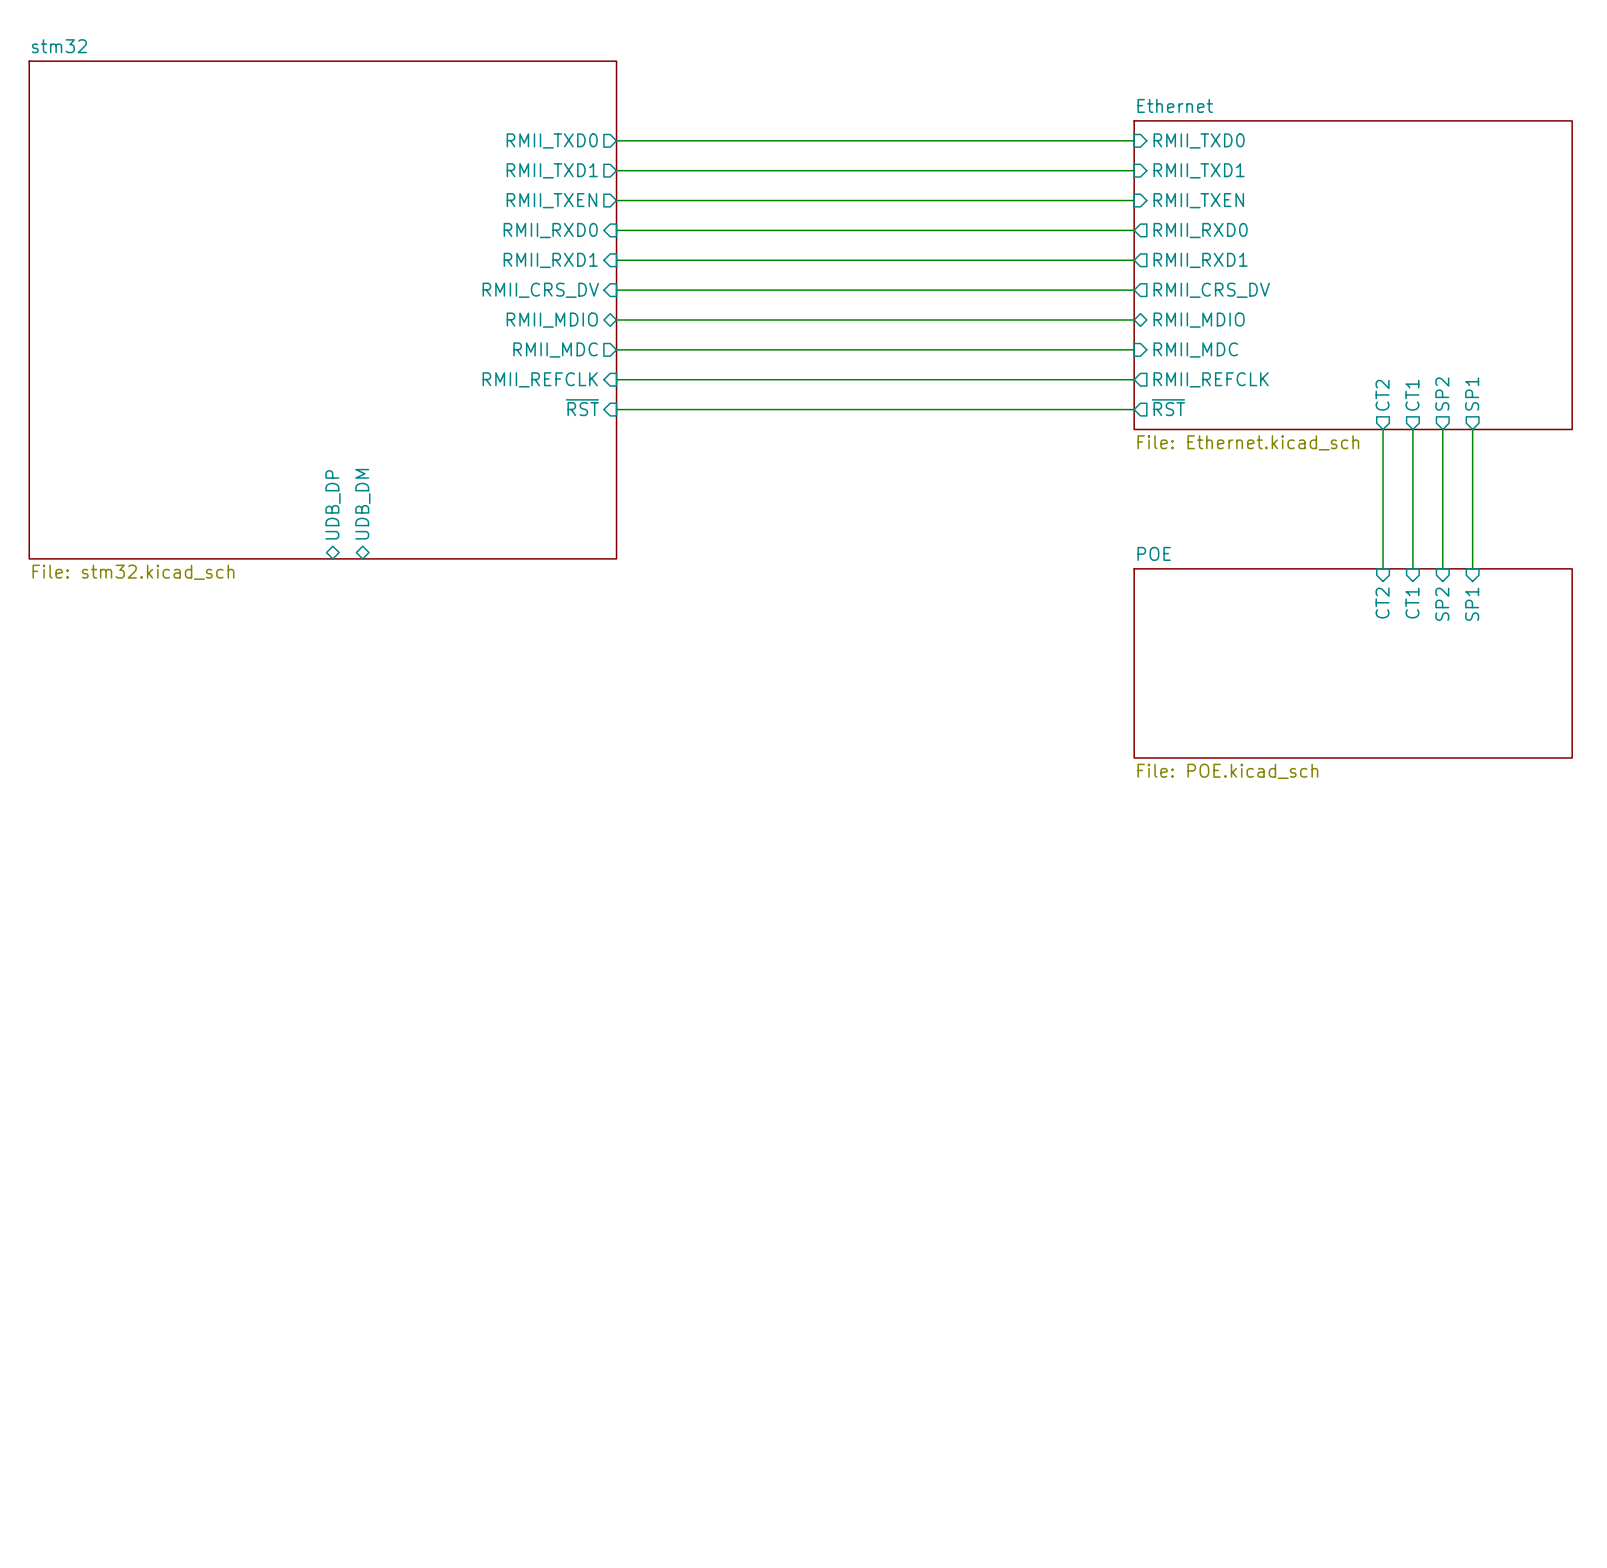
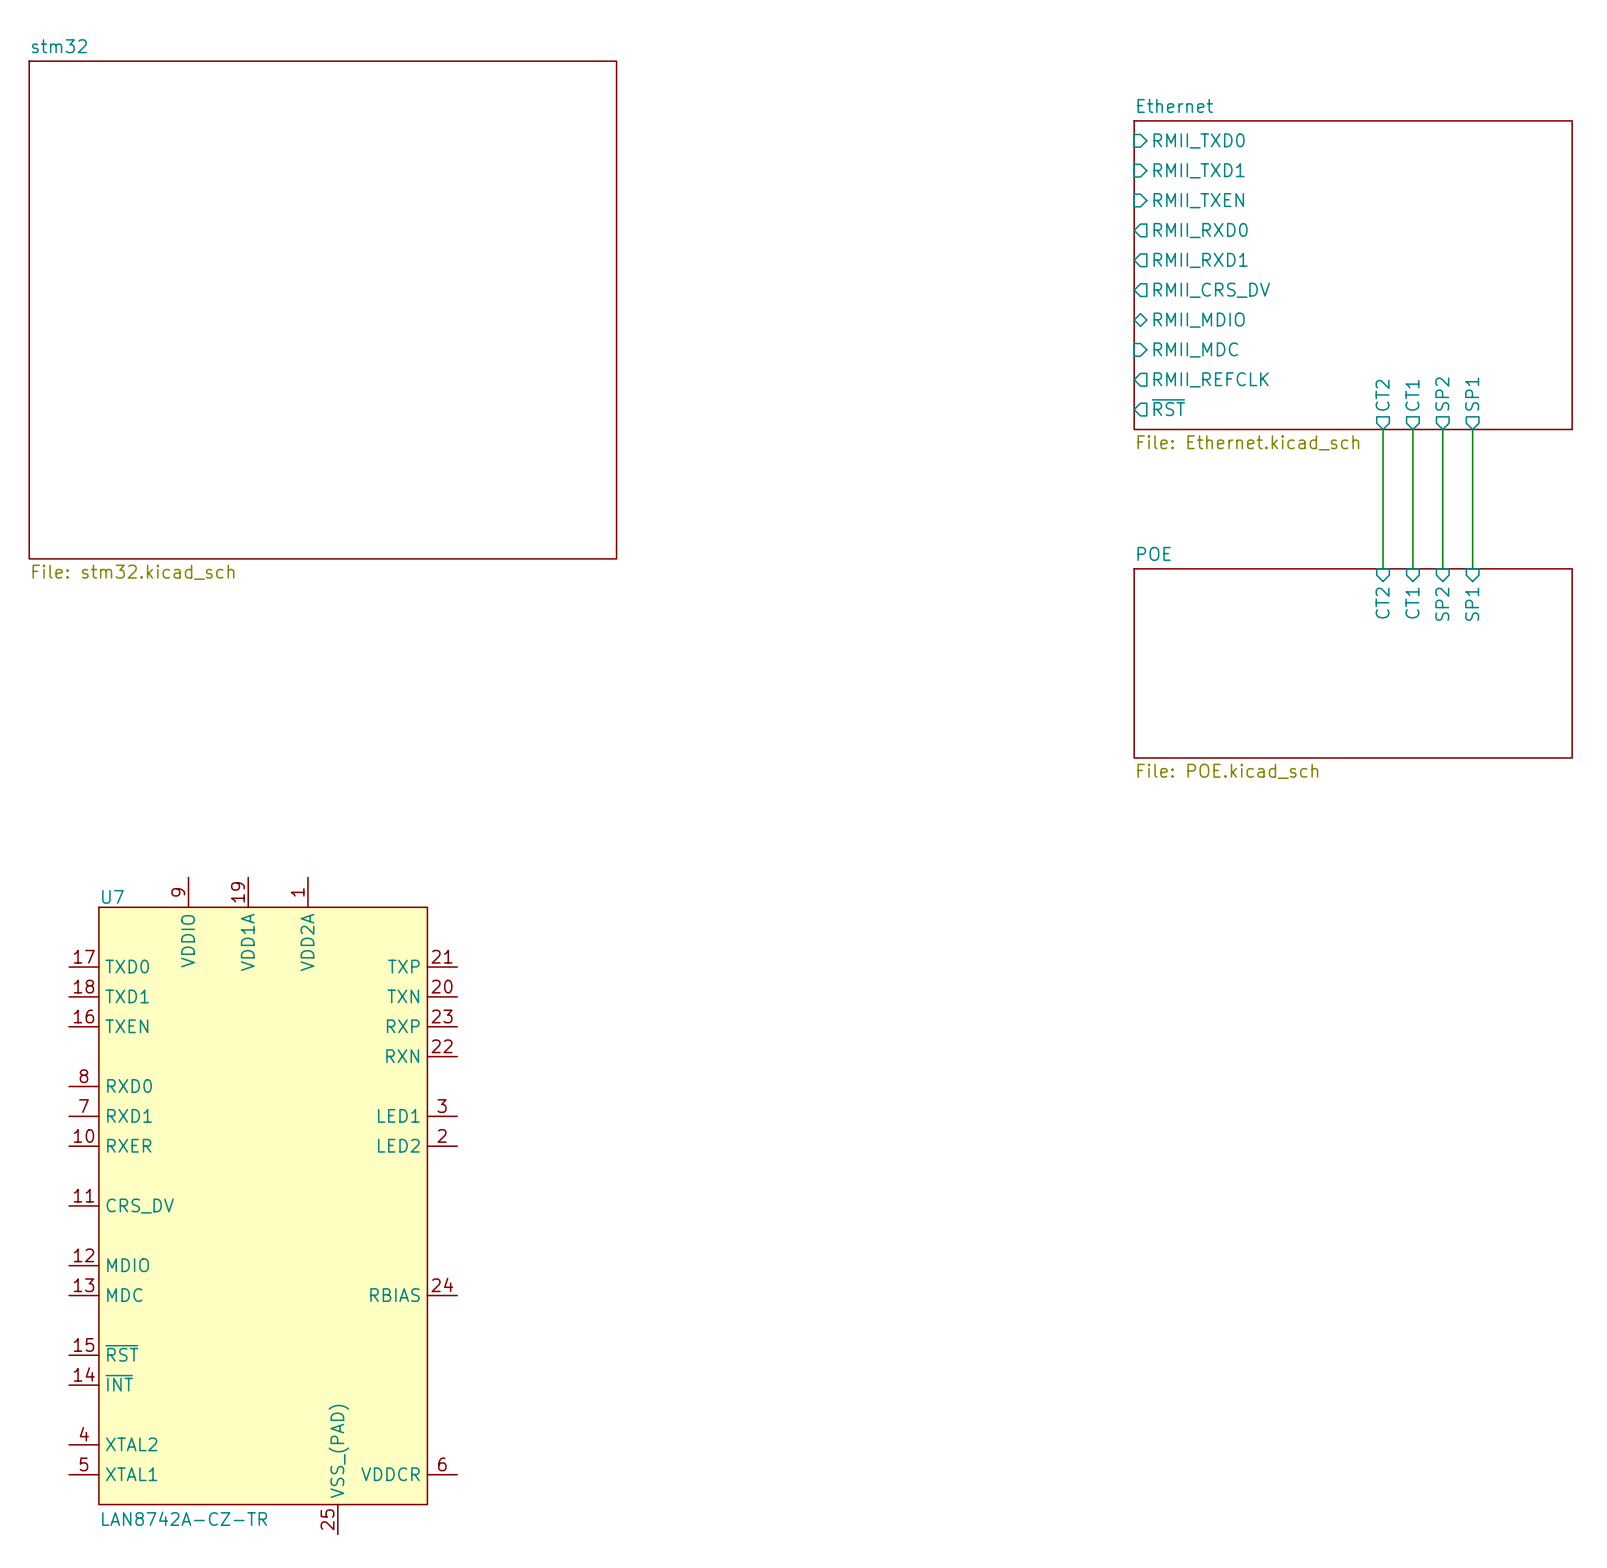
sheet pin: RMII_TXD0 (552, 140) -> none
wire: (616, 140) (1134, 140) -> none
sheet pin: RMII_TXD1 (552, 170) -> none
wire: (616, 170) (1134, 170) -> none
sheet pin: RMII_TXEN (551, 200) -> none
wire: (616, 200) (1134, 200) -> none
sheet pin: RMII_RXD0 (550, 230) -> none
wire: (616, 230) (1134, 230) -> none
sheet pin: RMII_RXD1 (550, 260) -> none
wire: (616, 260) (1134, 260) -> none
sheet pin: RMII_CRS_DV (540, 290) -> none
wire: (616, 290) (1134, 290) -> none
wire: (616, 319) (1134, 319) -> none
sheet pin: RMII_MDIO (552, 320) -> none
sheet pin: RMII_MDC (555, 349) -> none
wire: (616, 349) (1134, 349) -> none
sheet pin: RMII_REFCLK (540, 379) -> none
wire: (616, 379) (1134, 379) -> none
sheet pin: ~{RST} (582, 407) -> none
wire: (616, 409) (1134, 409) -> none
sheet pin: UDB_DP (332, 504) -> none
sheet pin: UDB_DM (362, 504) -> none
U7: none -> (263, 1205)

